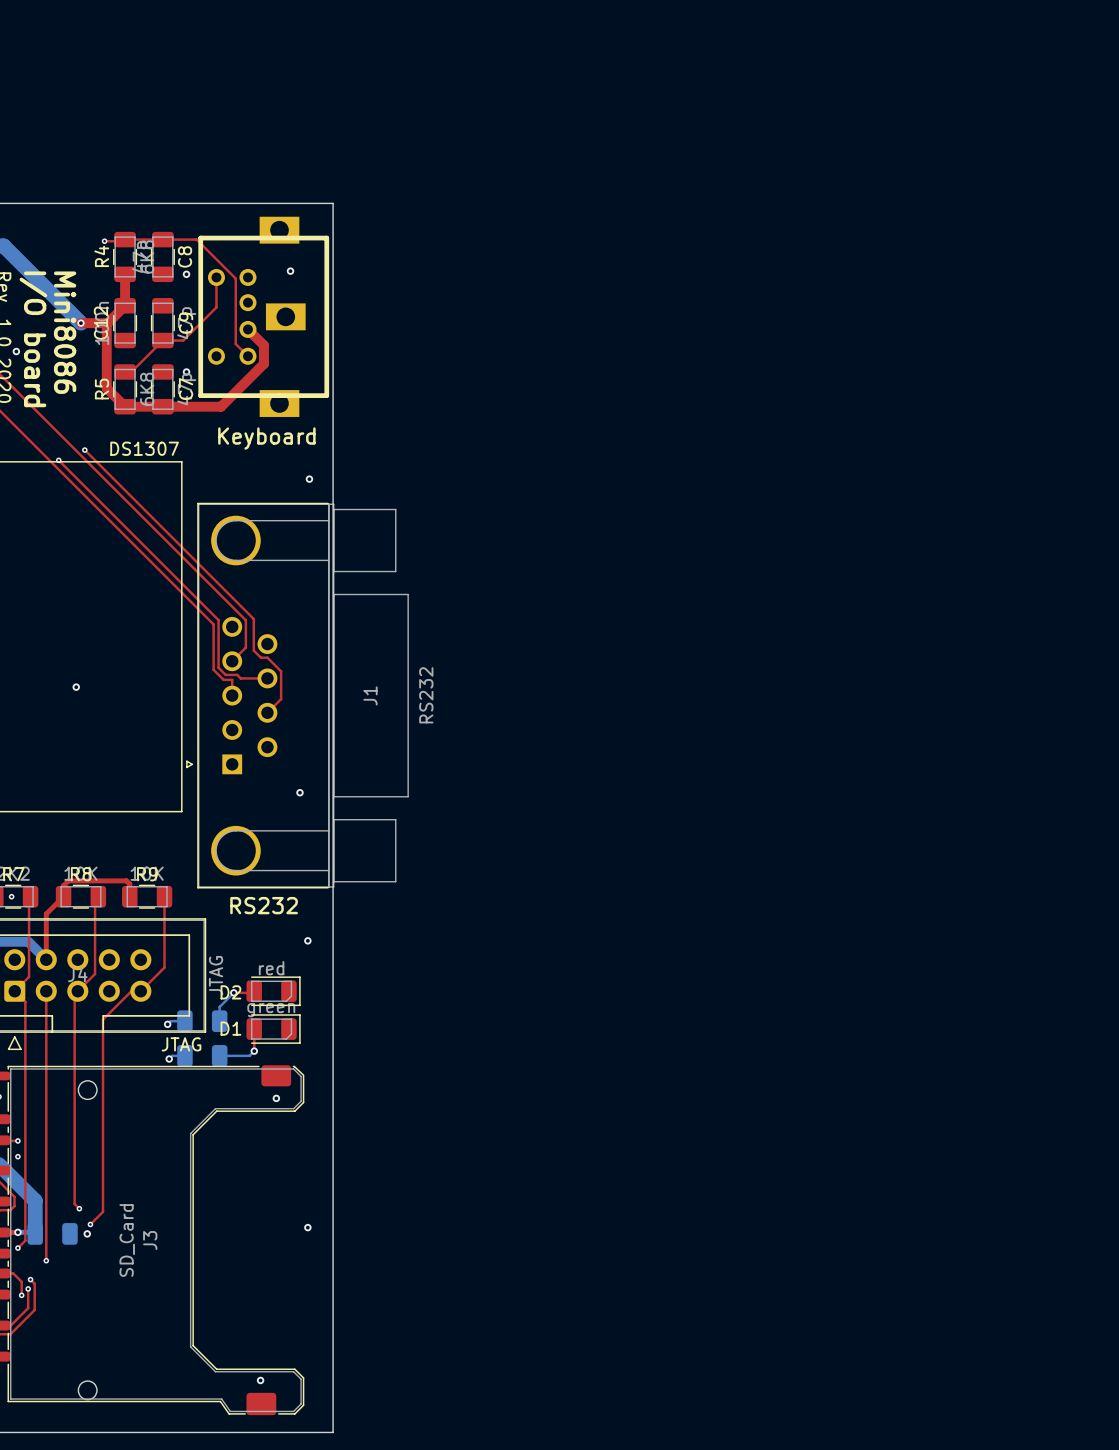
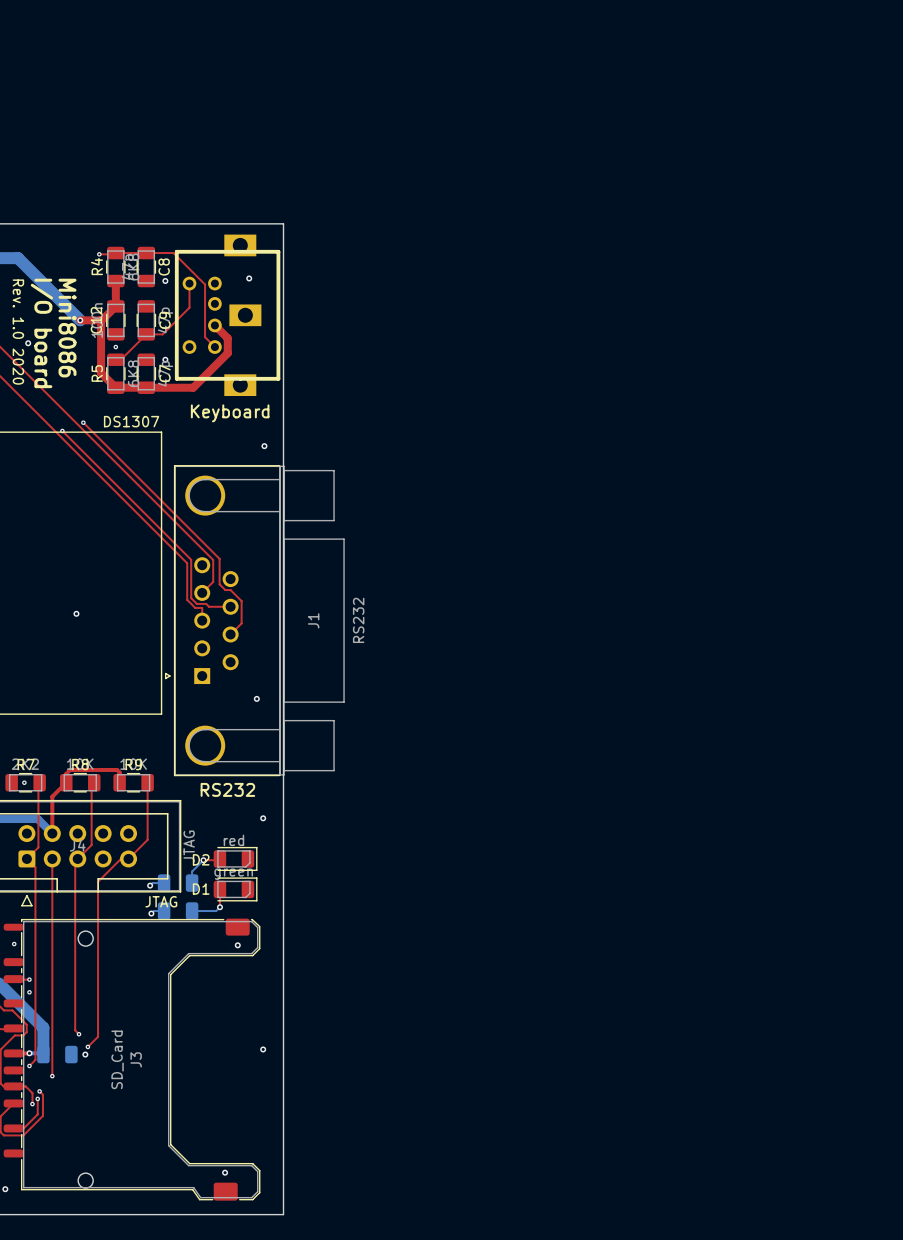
via: none -> (115, 347)

